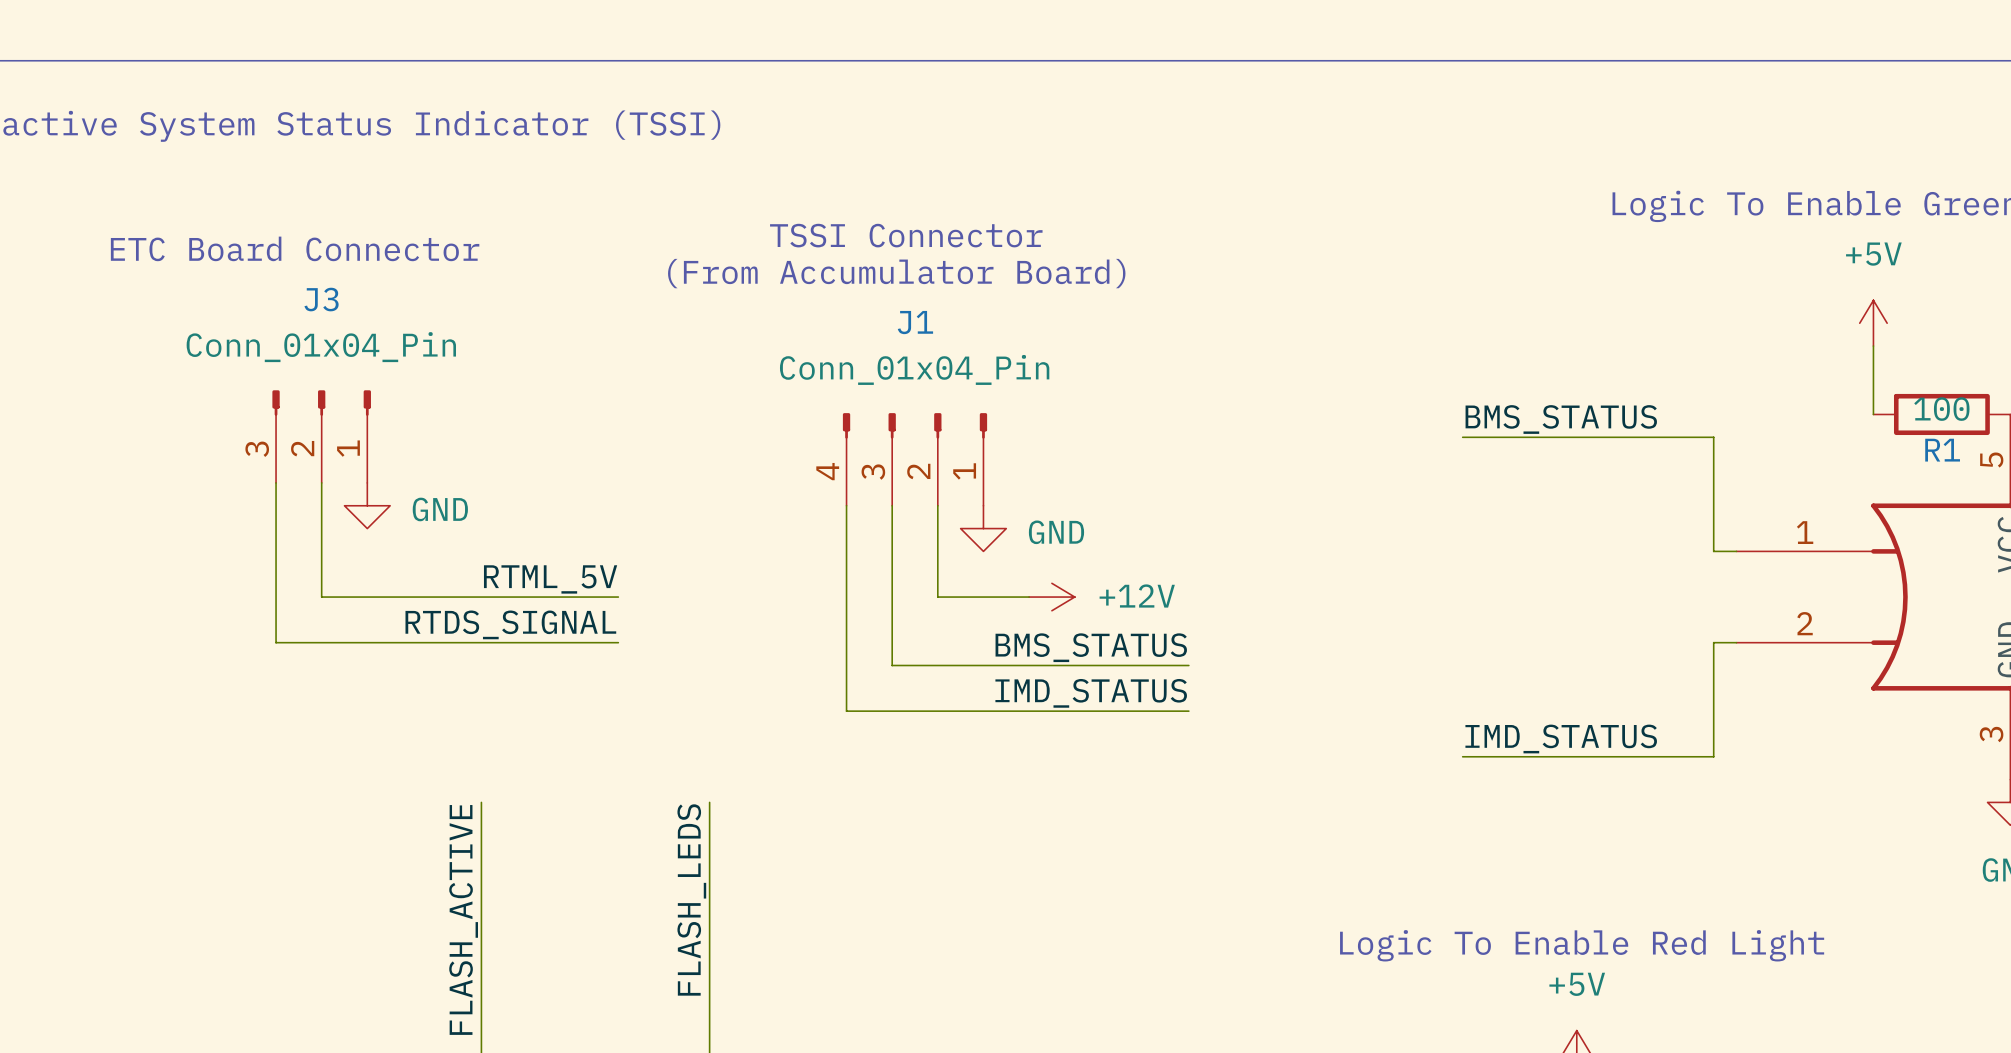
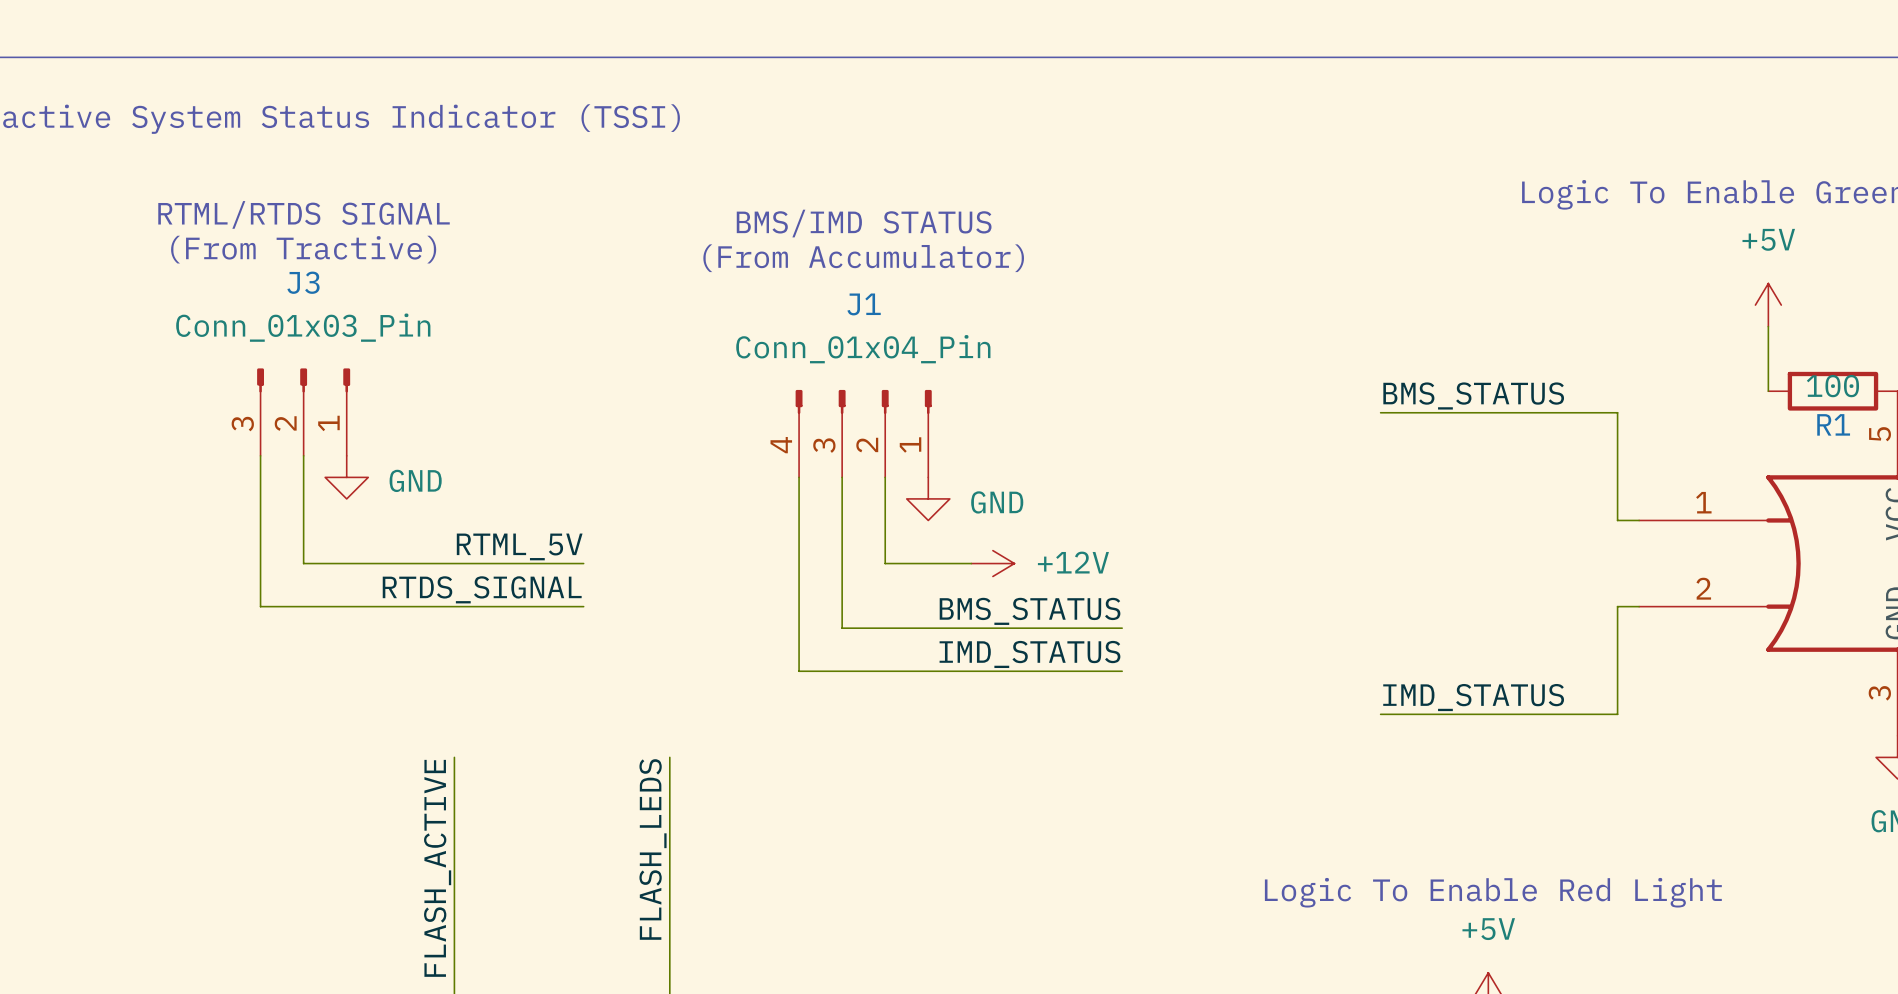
text: none -> RTML/RTDS SIGNAL (304, 214)
text: TSSI Connector (906, 235) -> none
text: none -> BMS/IMD STATUS (864, 223)
text: ETC Board Connector (295, 248) -> none
text: none -> (From Tractive) (303, 249)
text: (From Accumulator Board) (896, 273) -> (From Accumulator) (863, 258)
J3 value: Conn_01x04_Pin (321, 347) -> Conn_01x03_Pin (303, 327)

